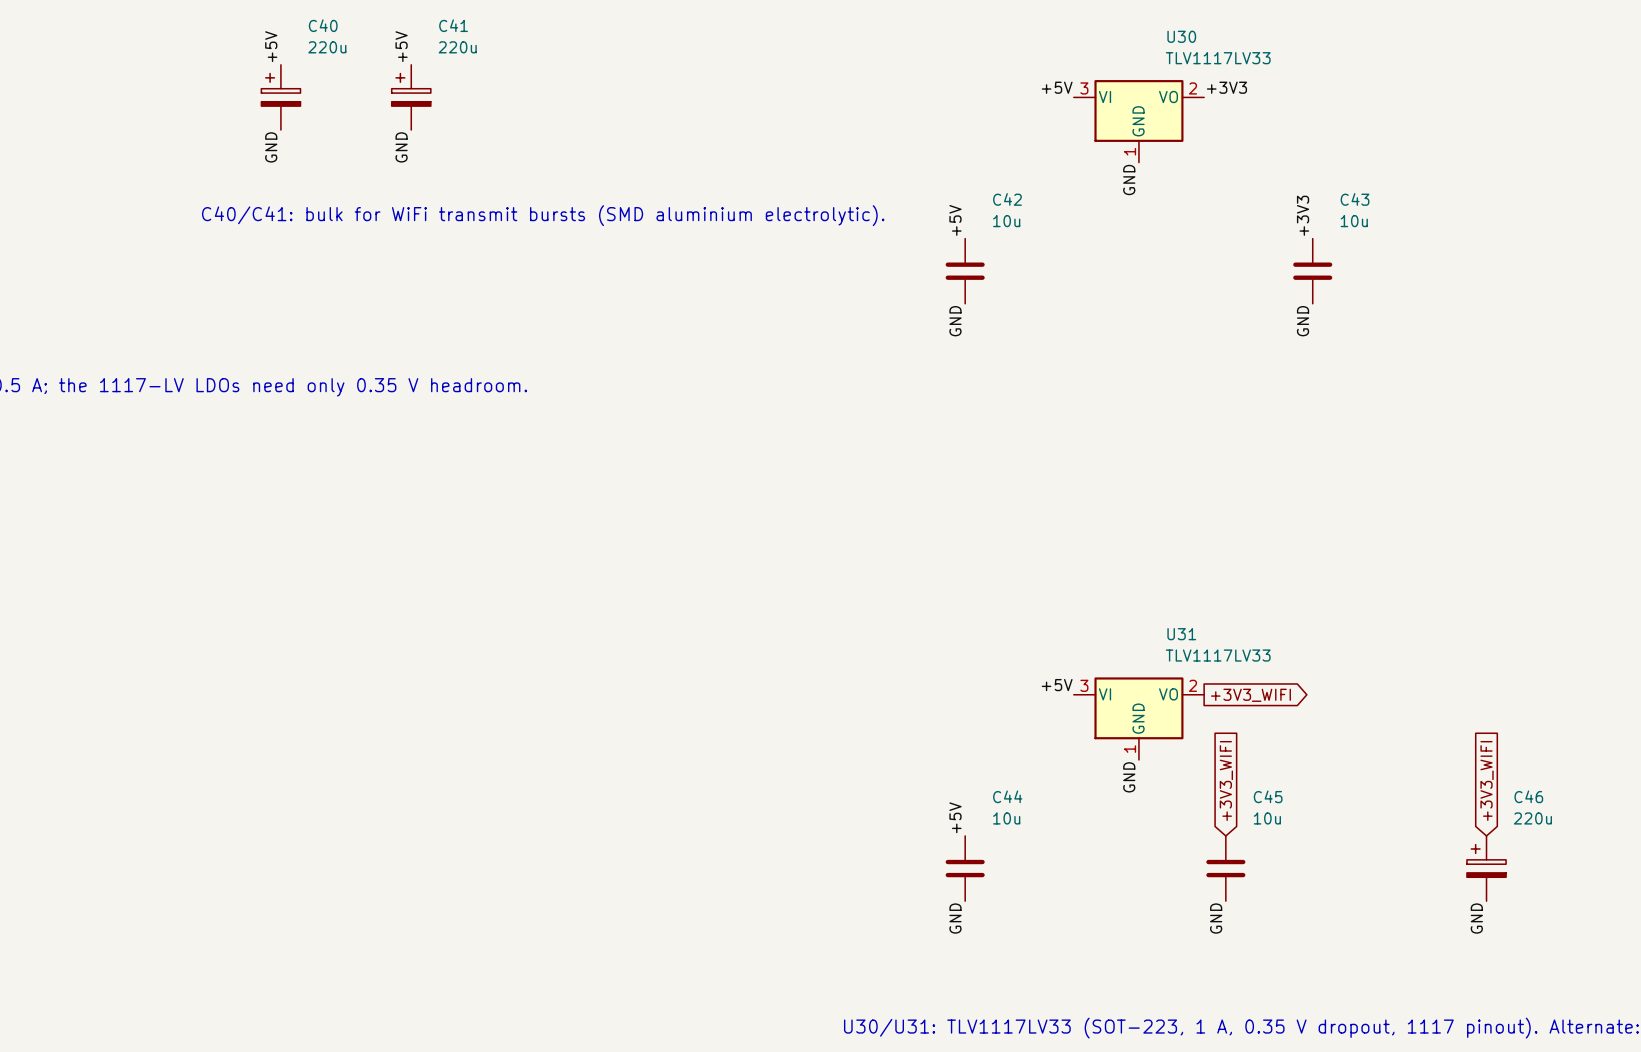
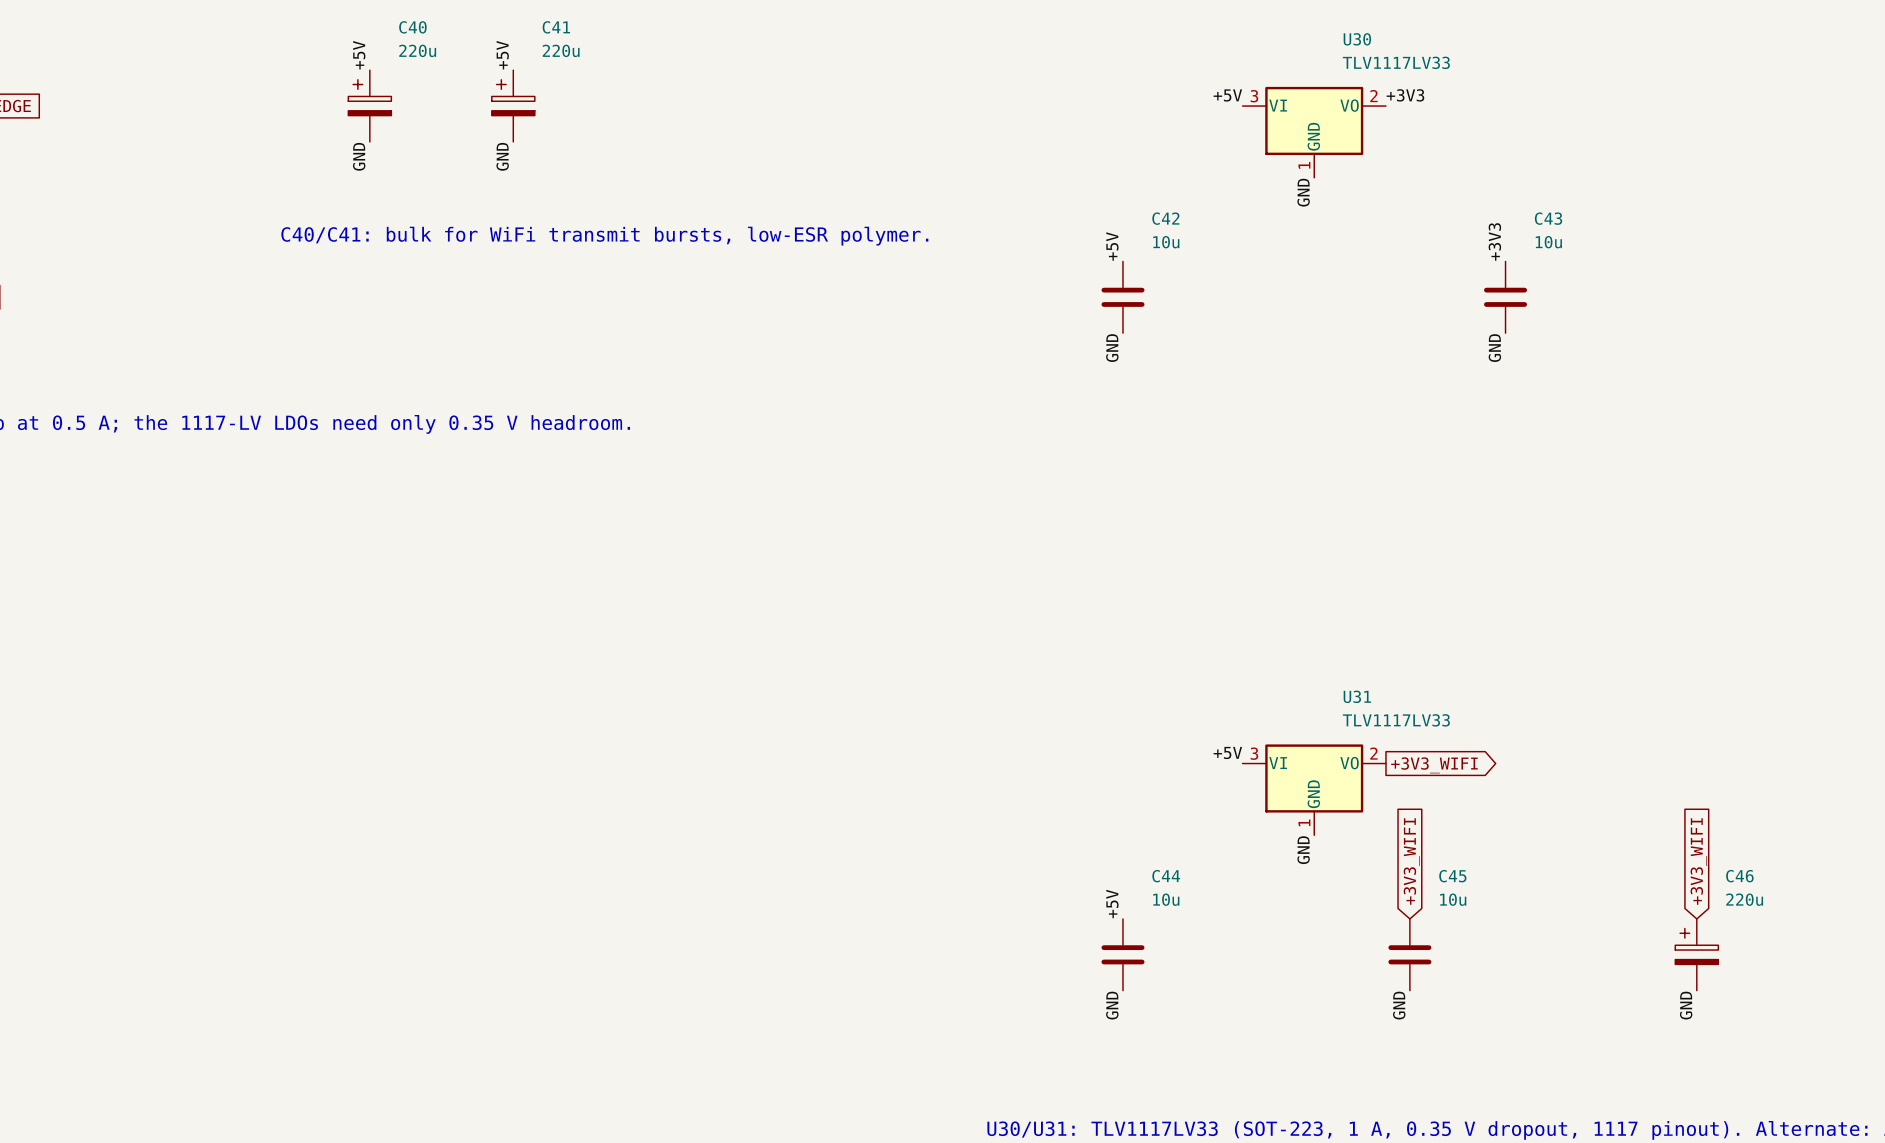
text: C40/C41: bulk for WiFi transmit bursts (SMD aluminium electrolytic). (543, 215) -> C40/C41: bulk for WiFi transmit bursts, low-ESR polymer. (604, 236)

